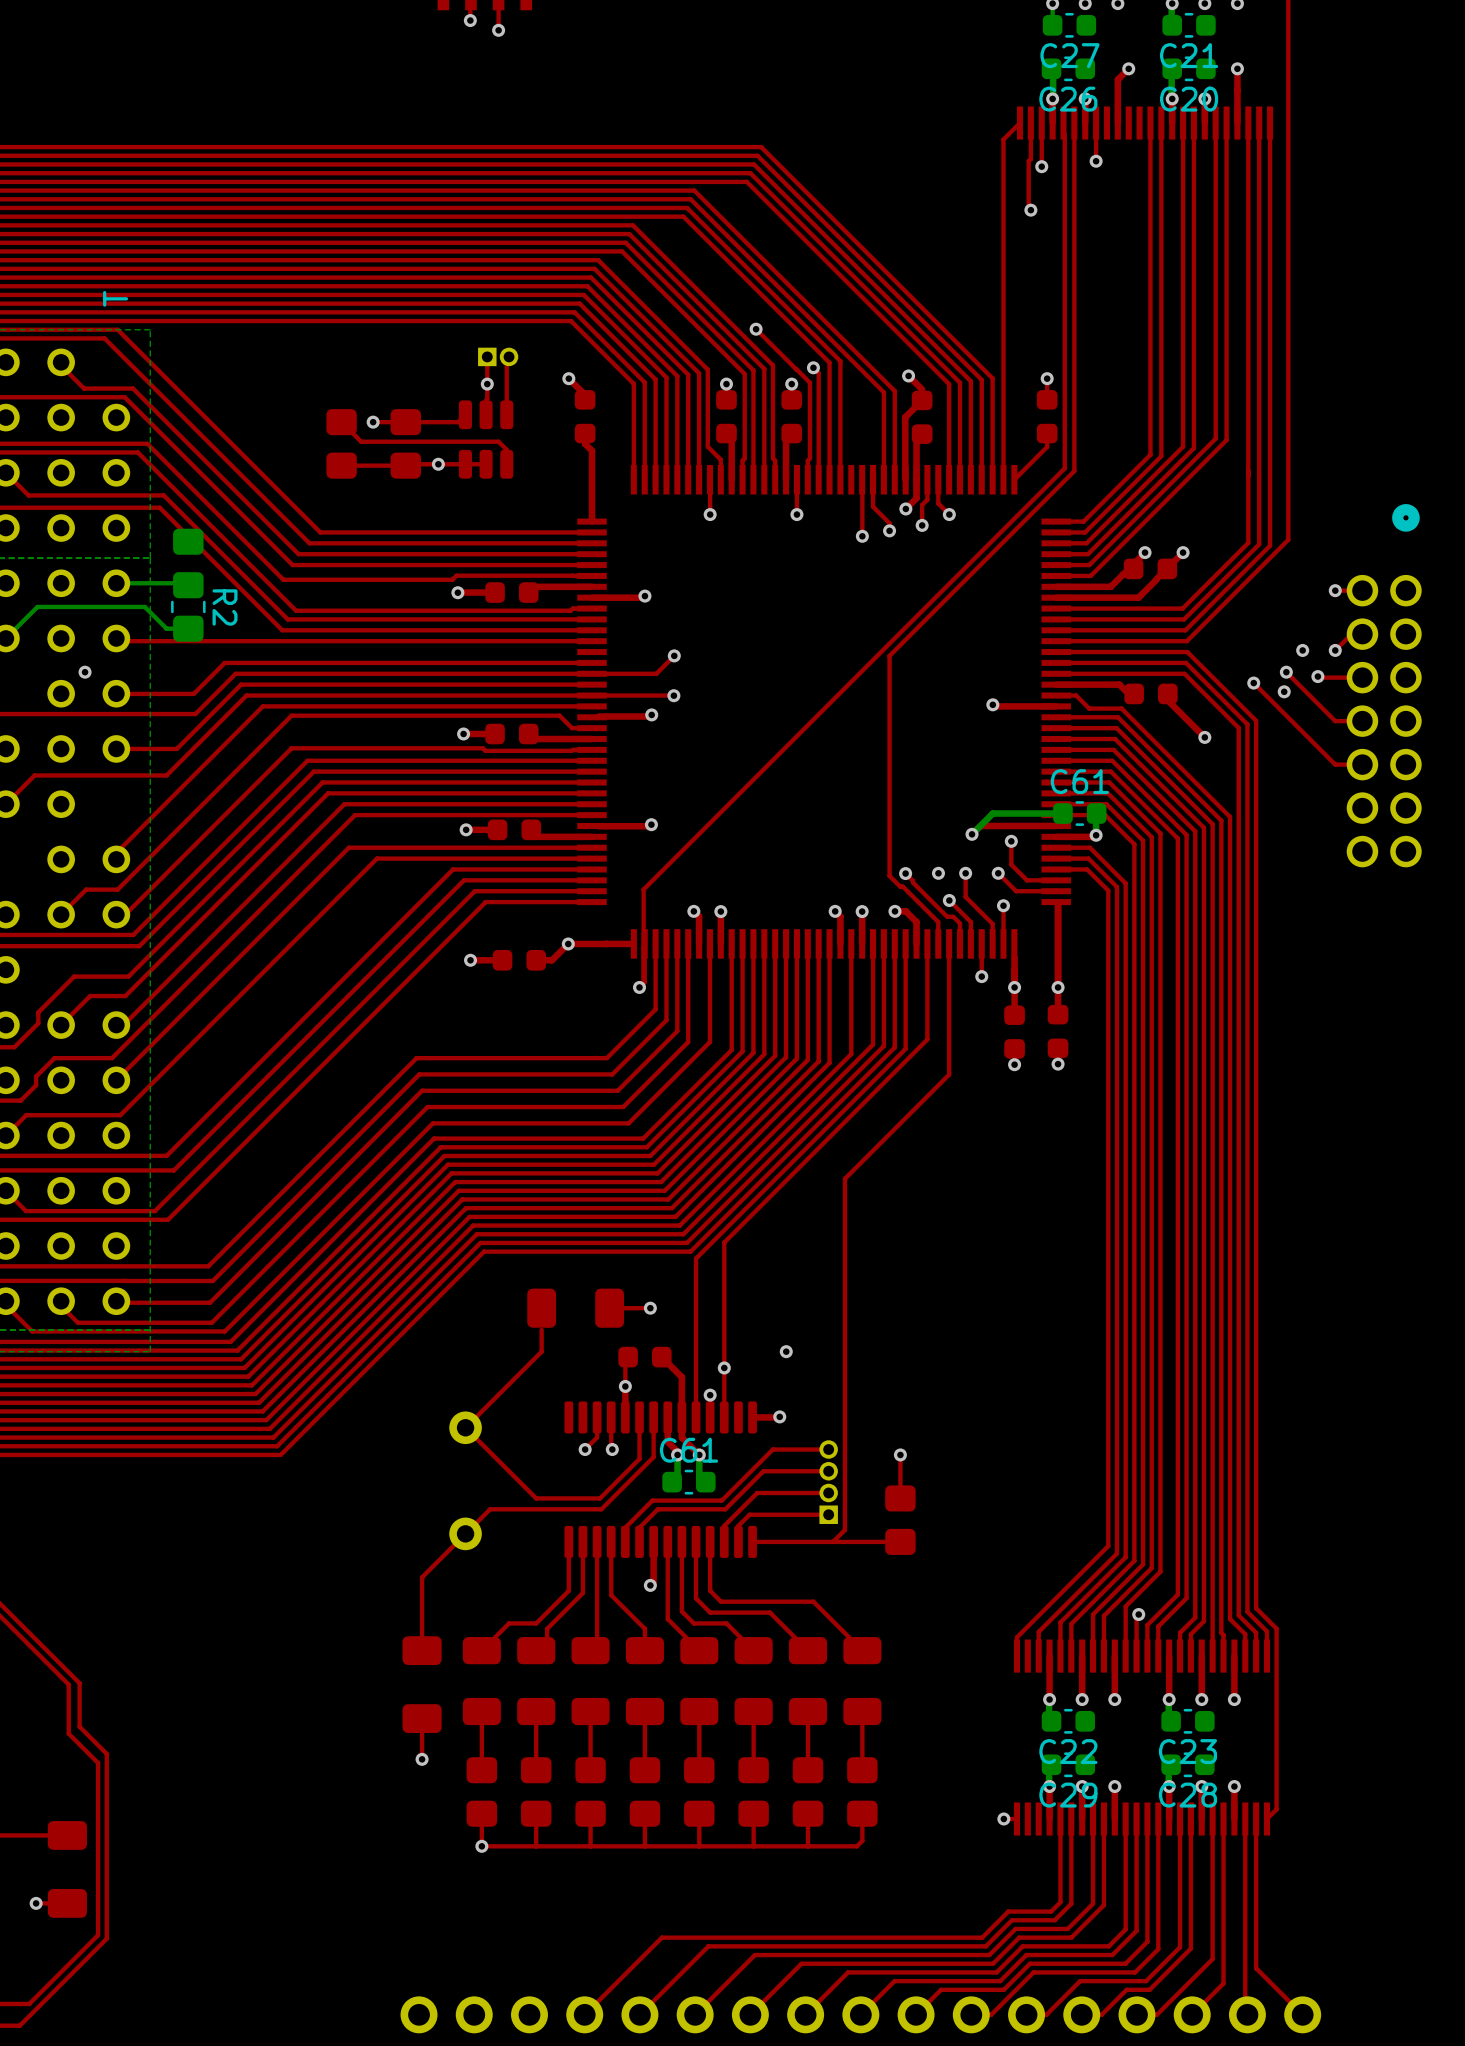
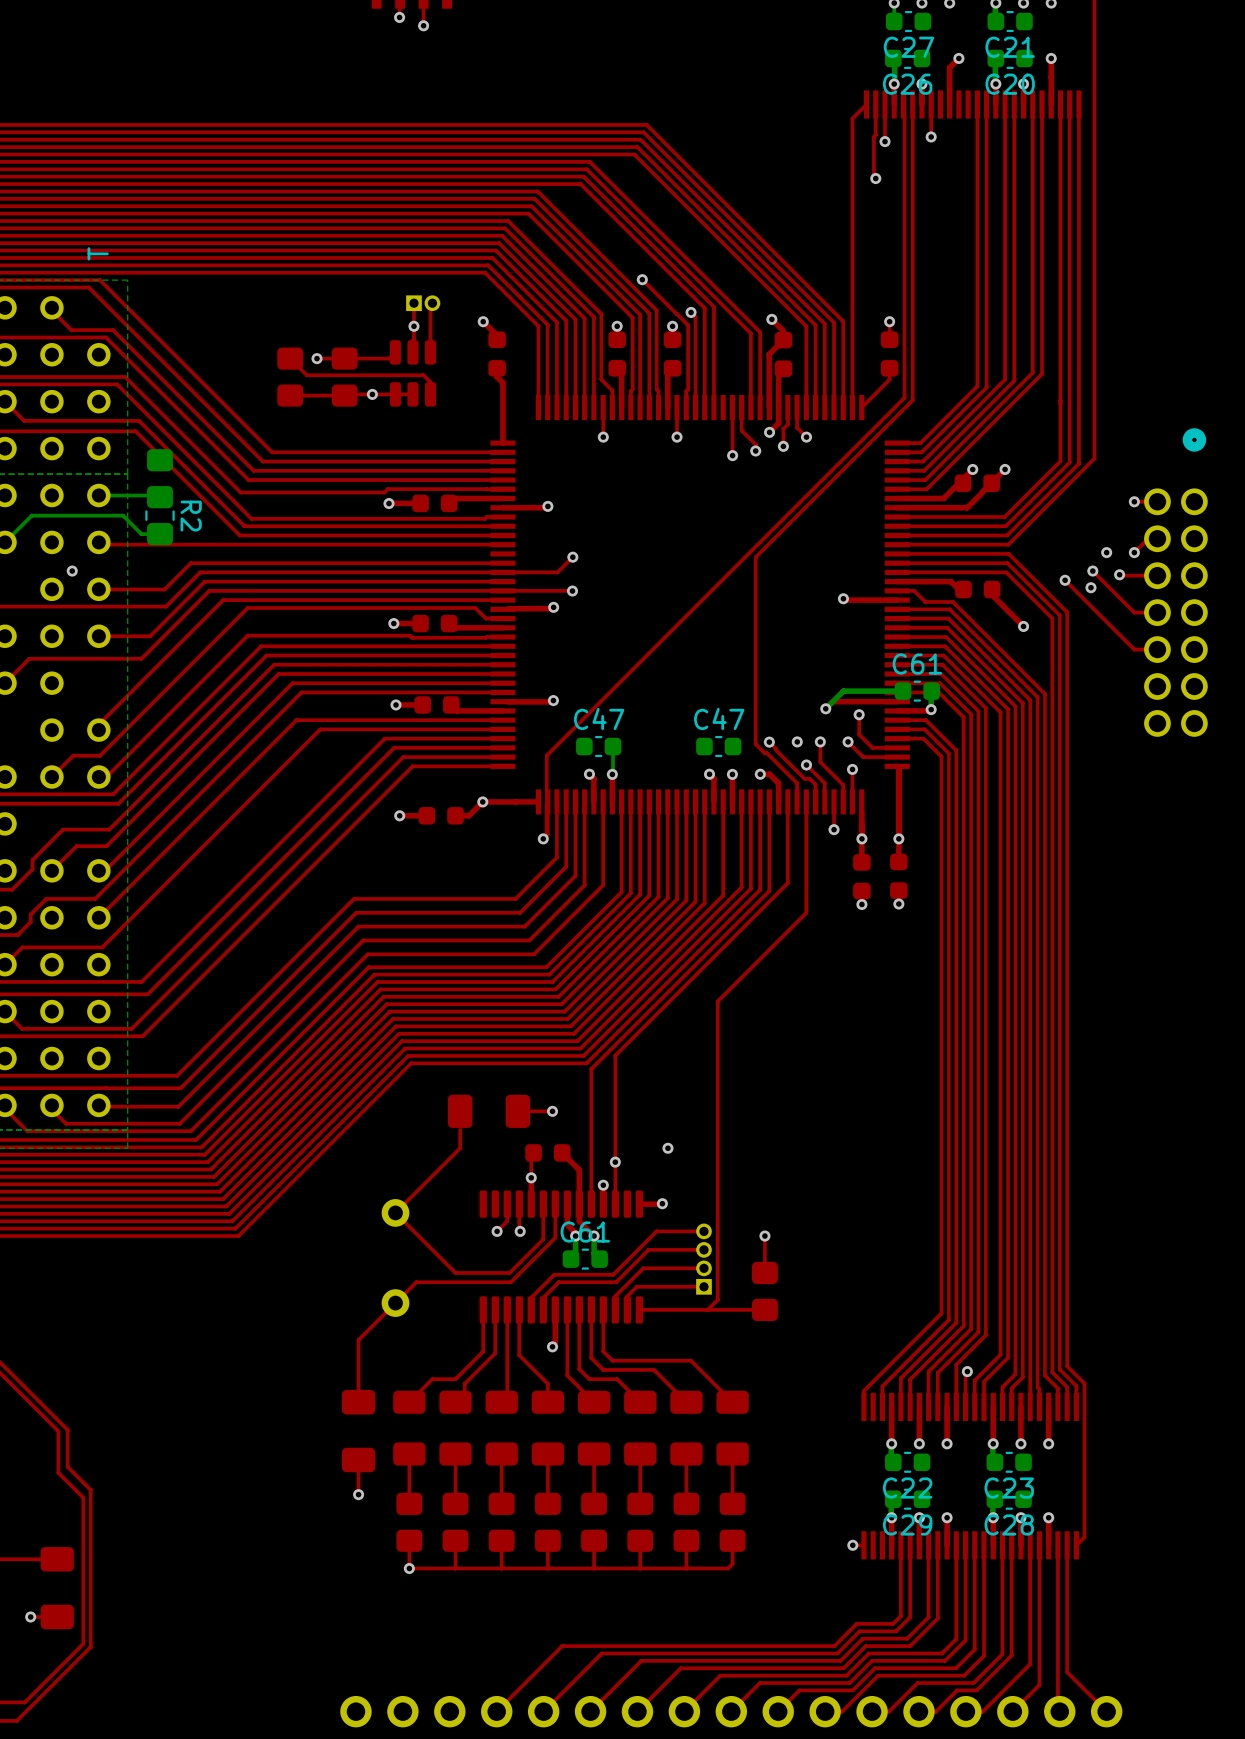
C47: none -> (598, 746)
bottom track: none -> (613, 746) (612, 774)
C47: none -> (718, 746)

